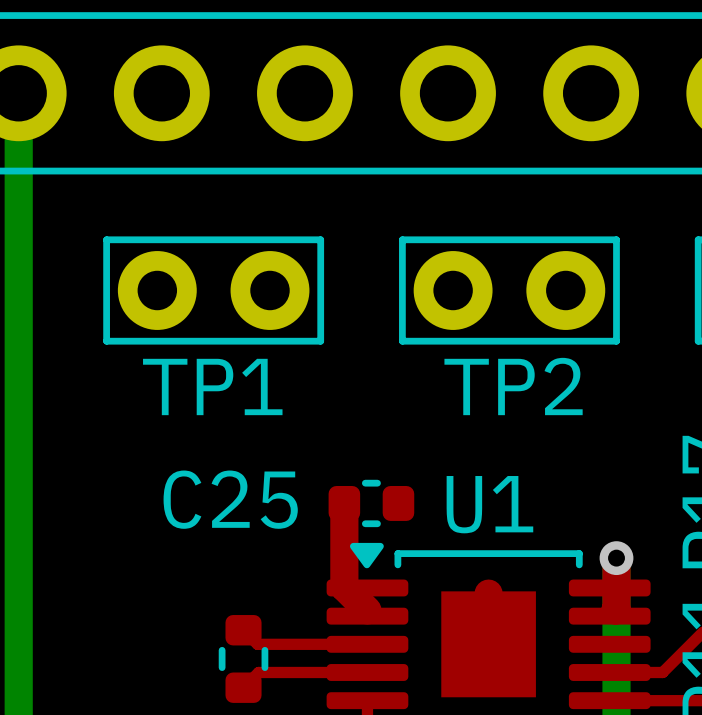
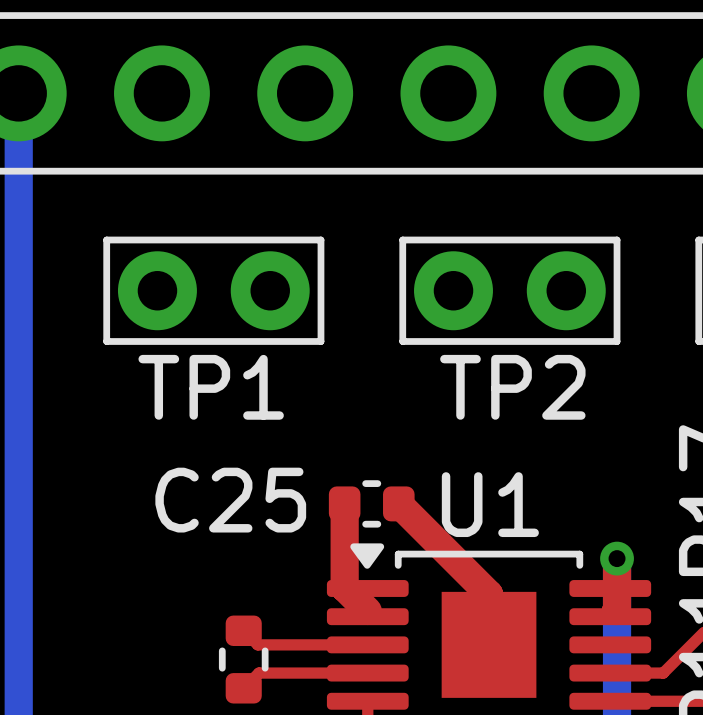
top track: none -> (398, 503) (489, 594)

